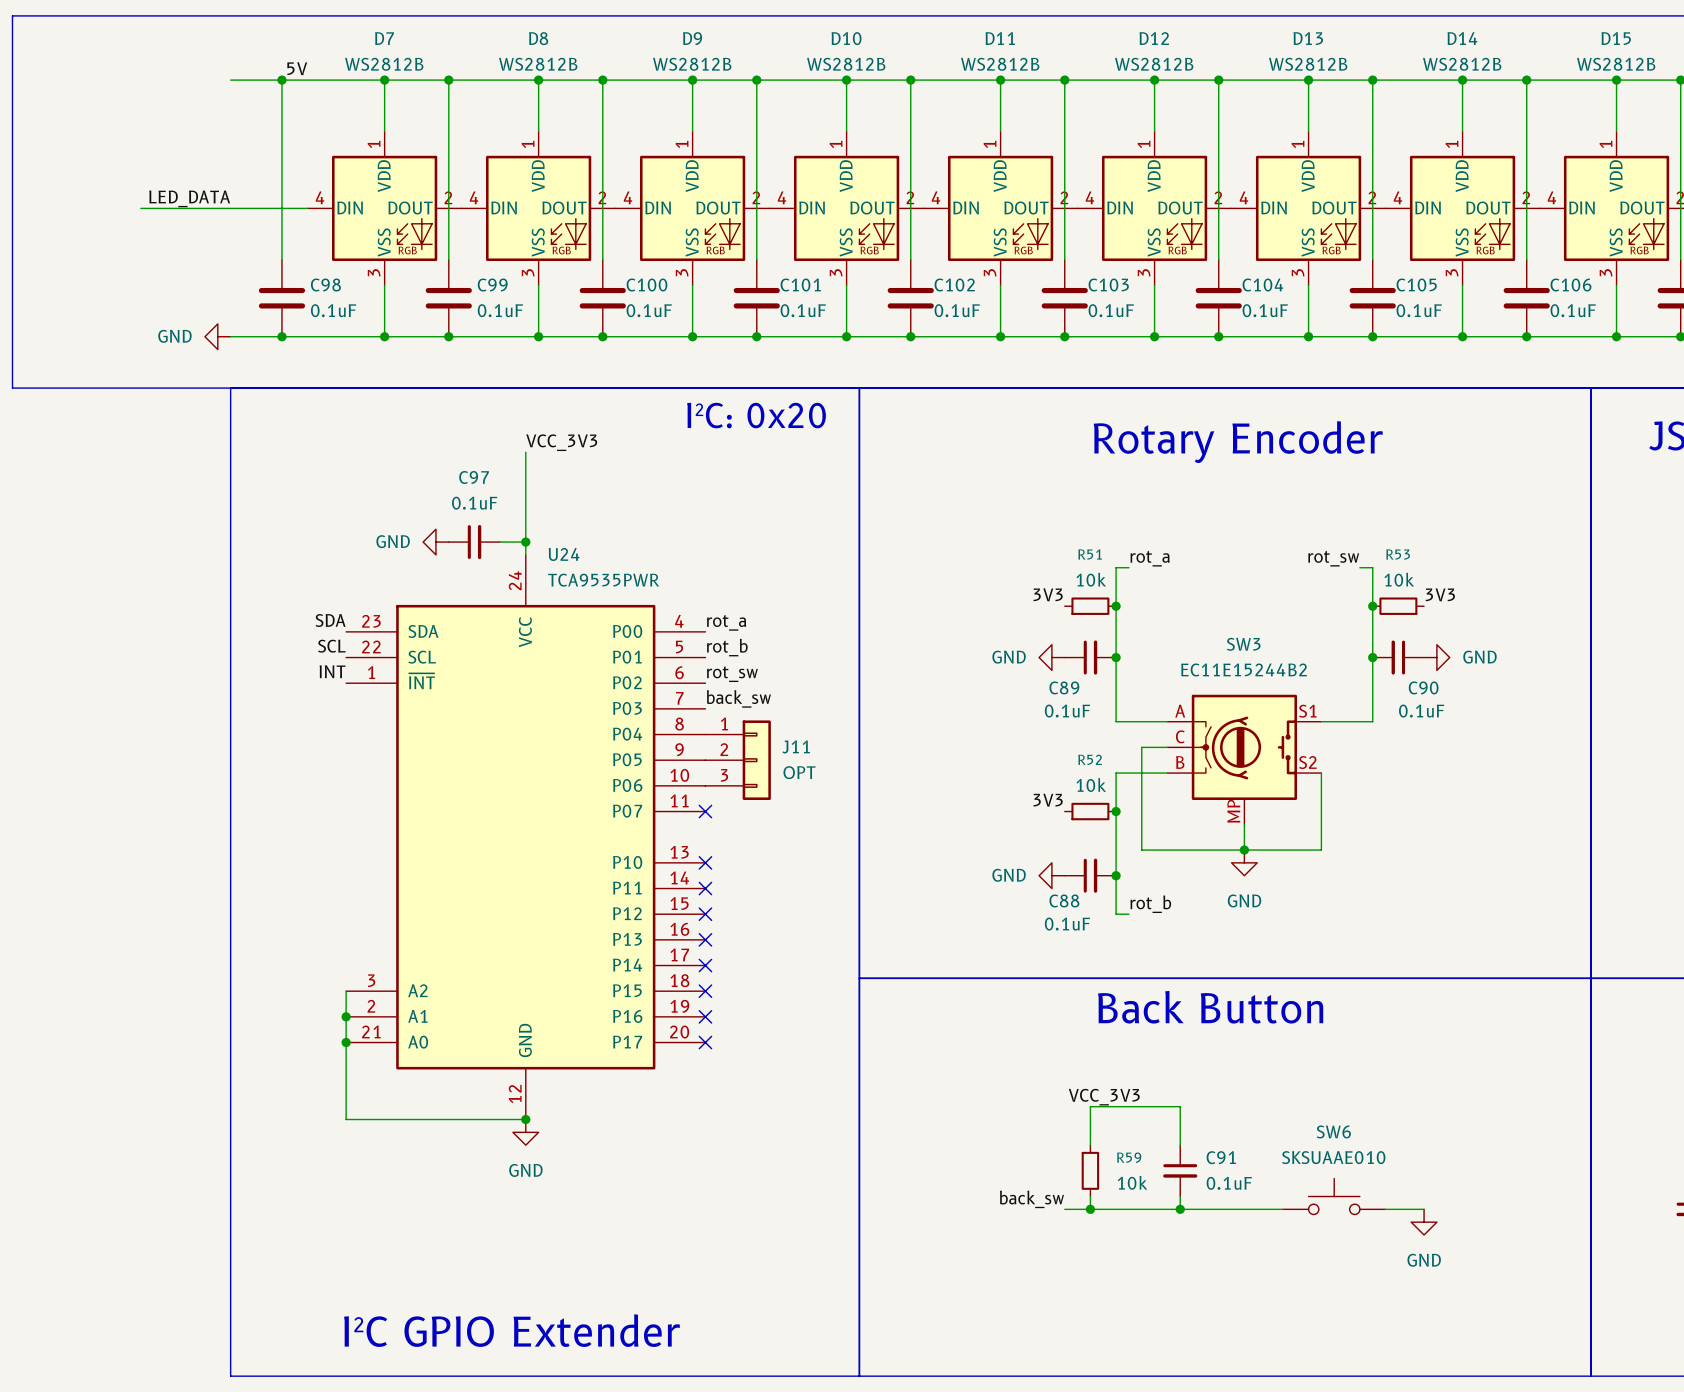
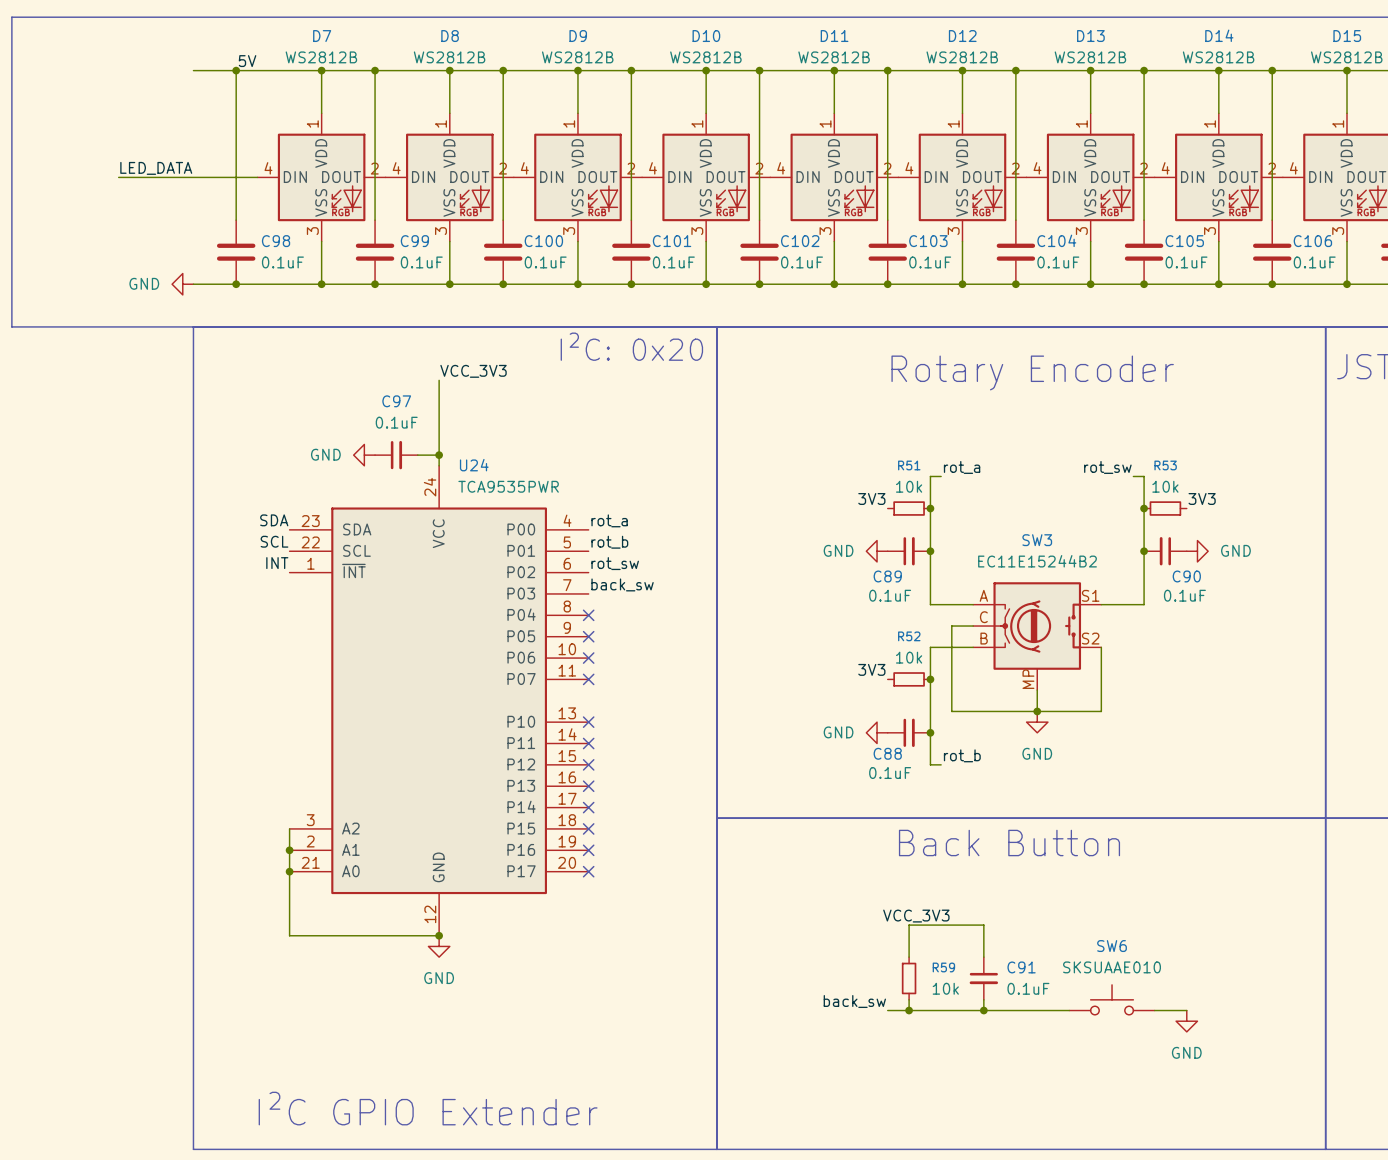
no-connect mark: none -> (588, 615)
no-connect mark: none -> (588, 636)
J11: OPT (738, 760) -> none
no-connect mark: none -> (588, 658)

